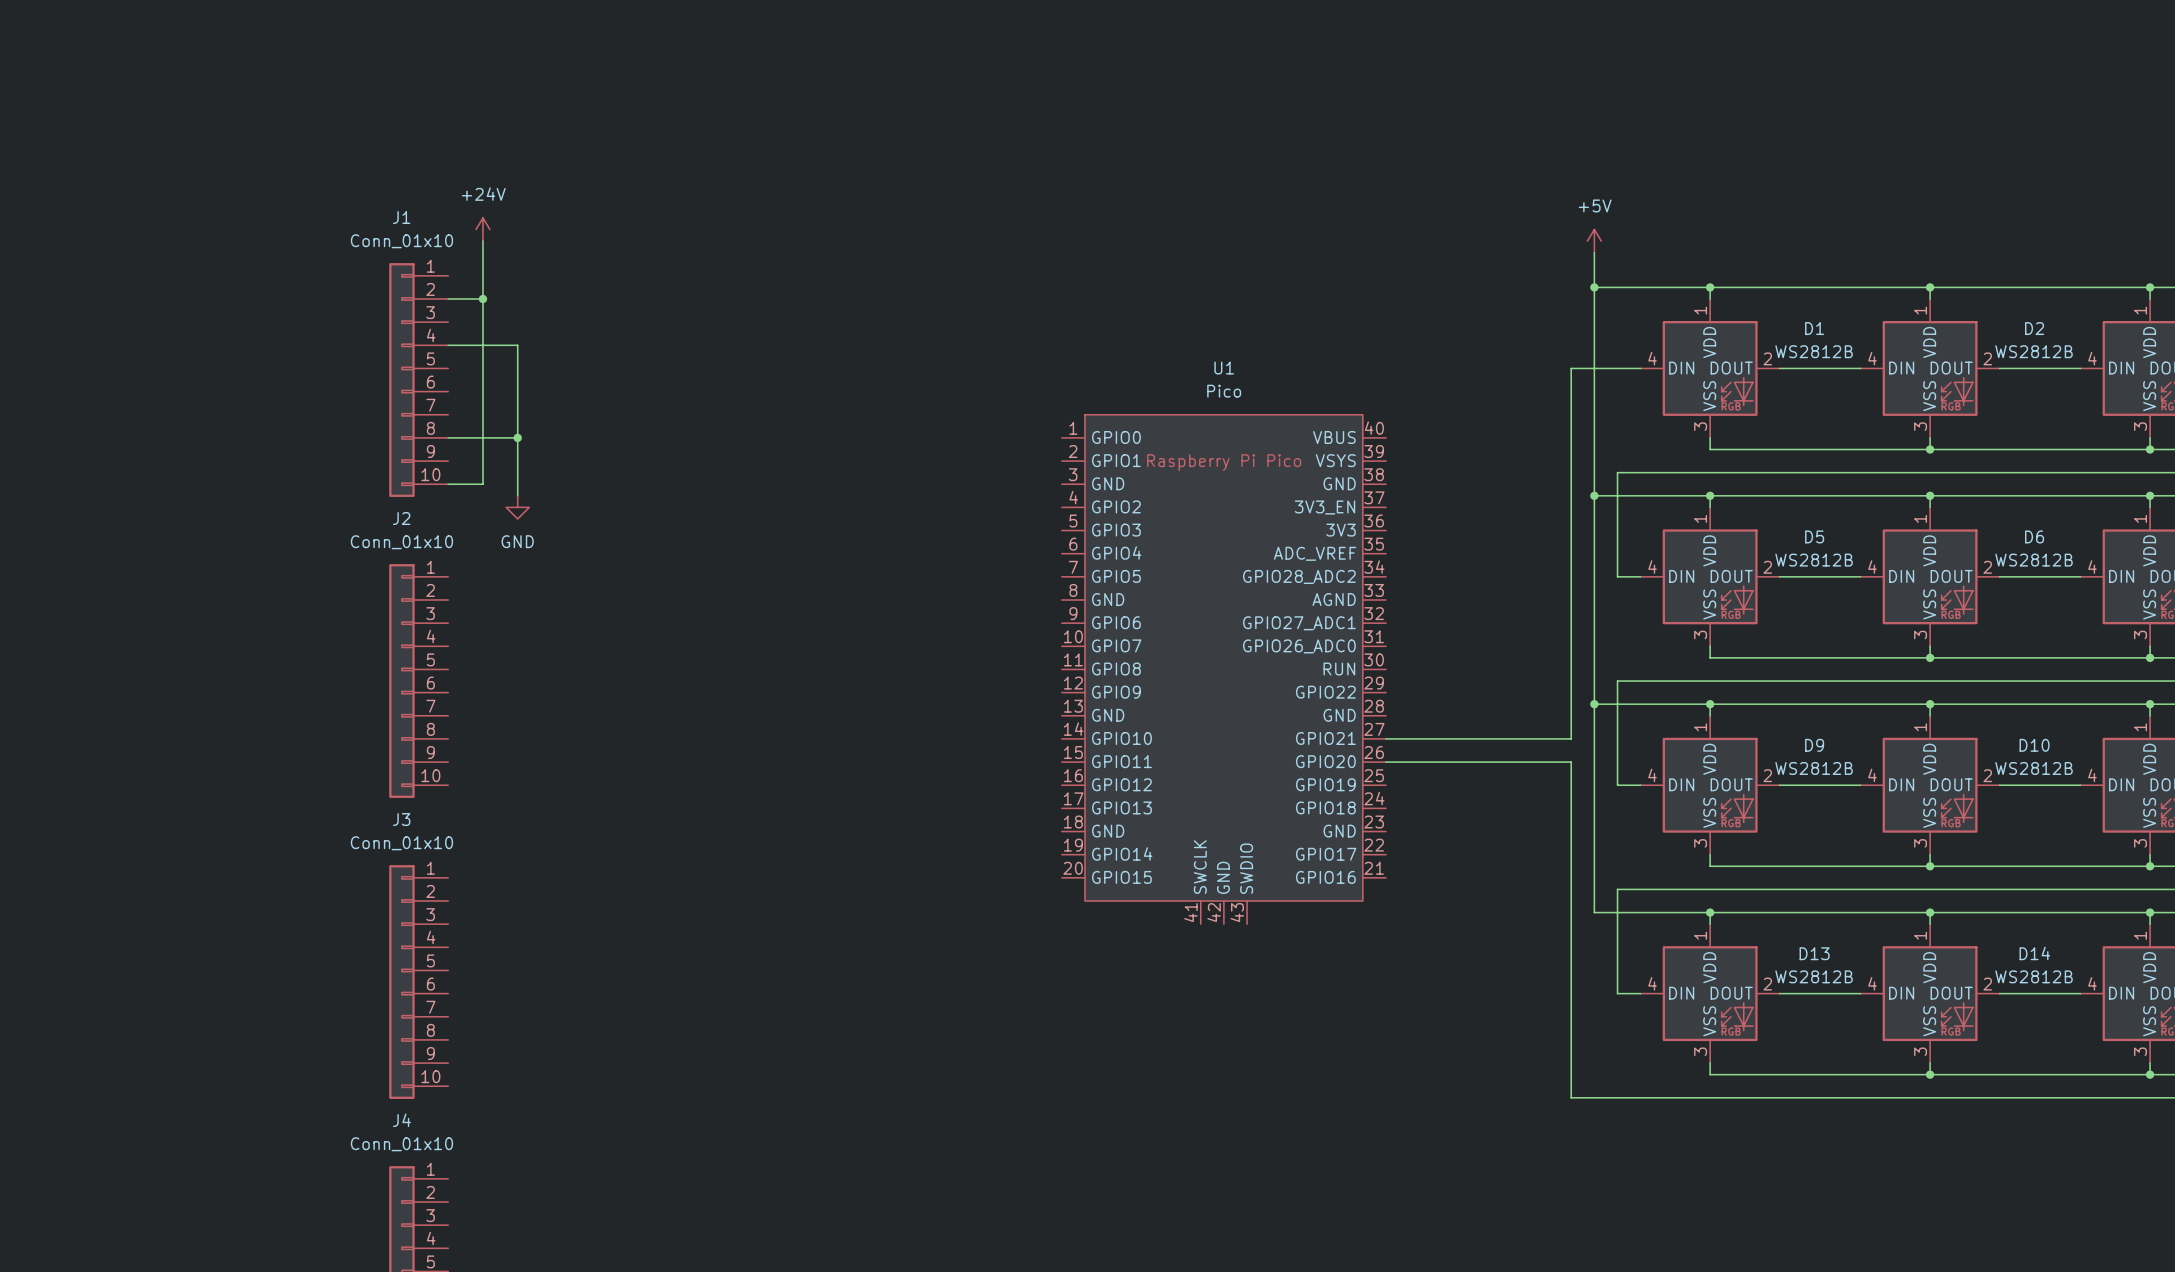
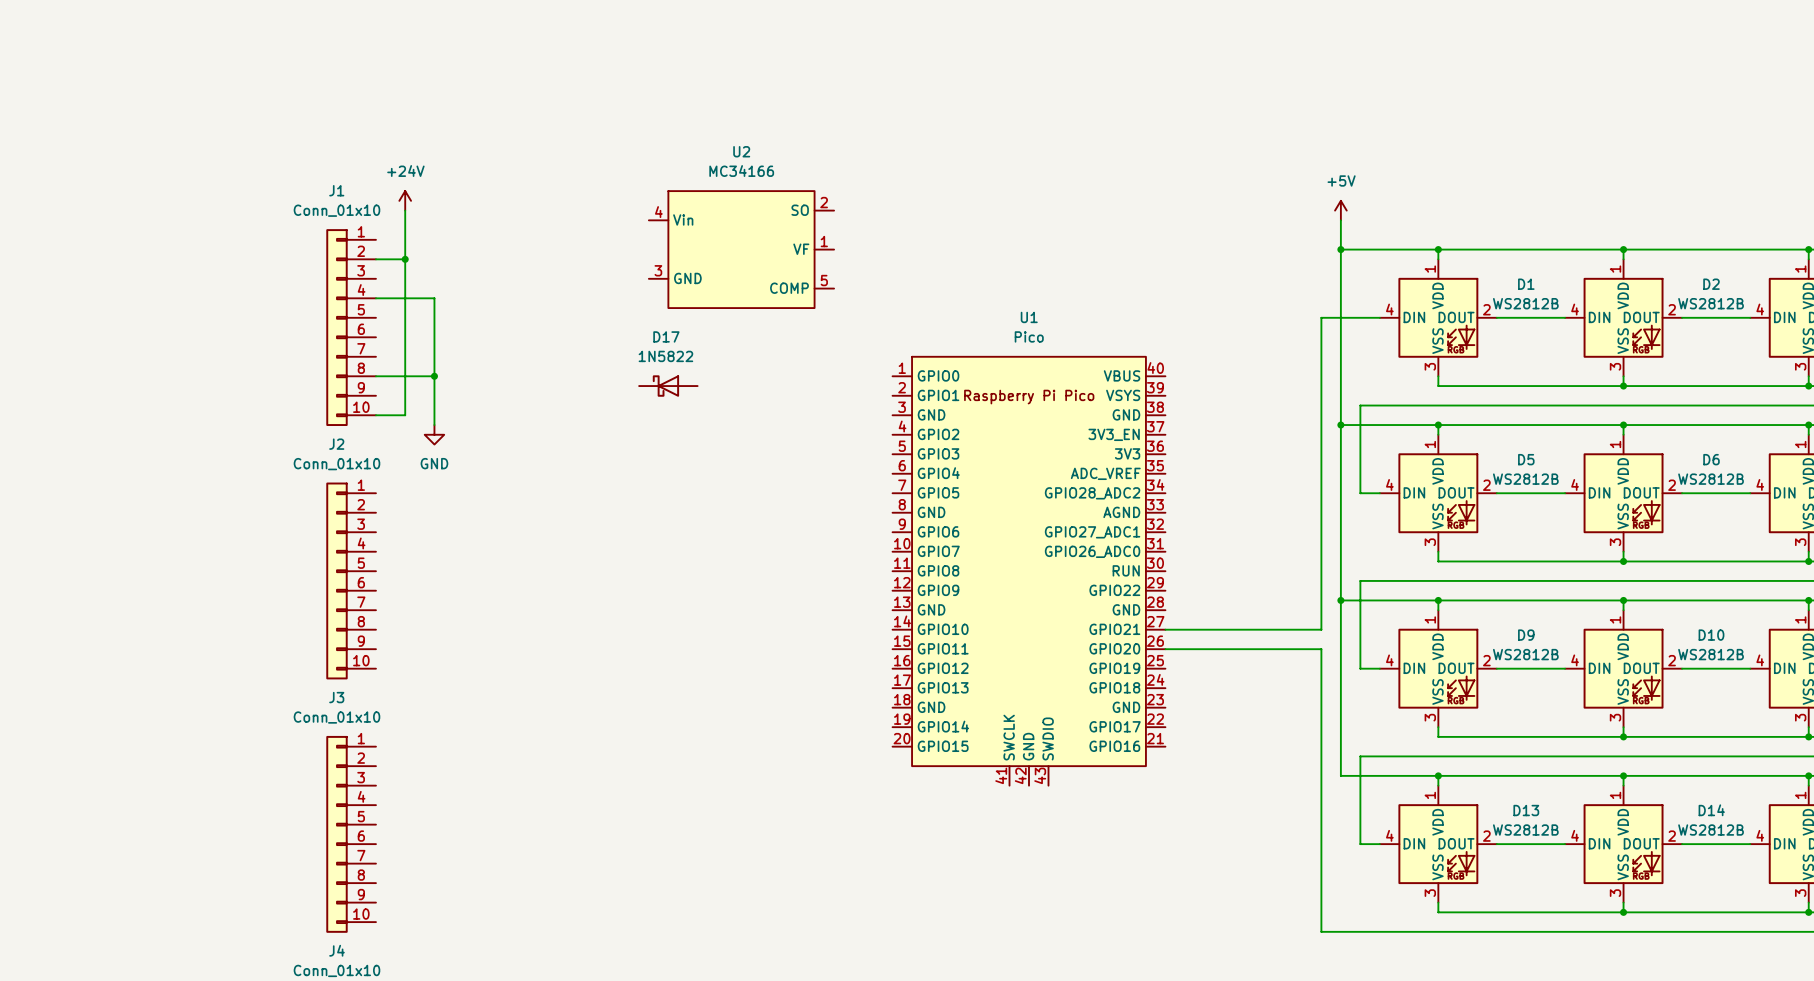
U2: none -> MC34166 (741, 249)
D17: none -> 1N5822 (668, 386)

